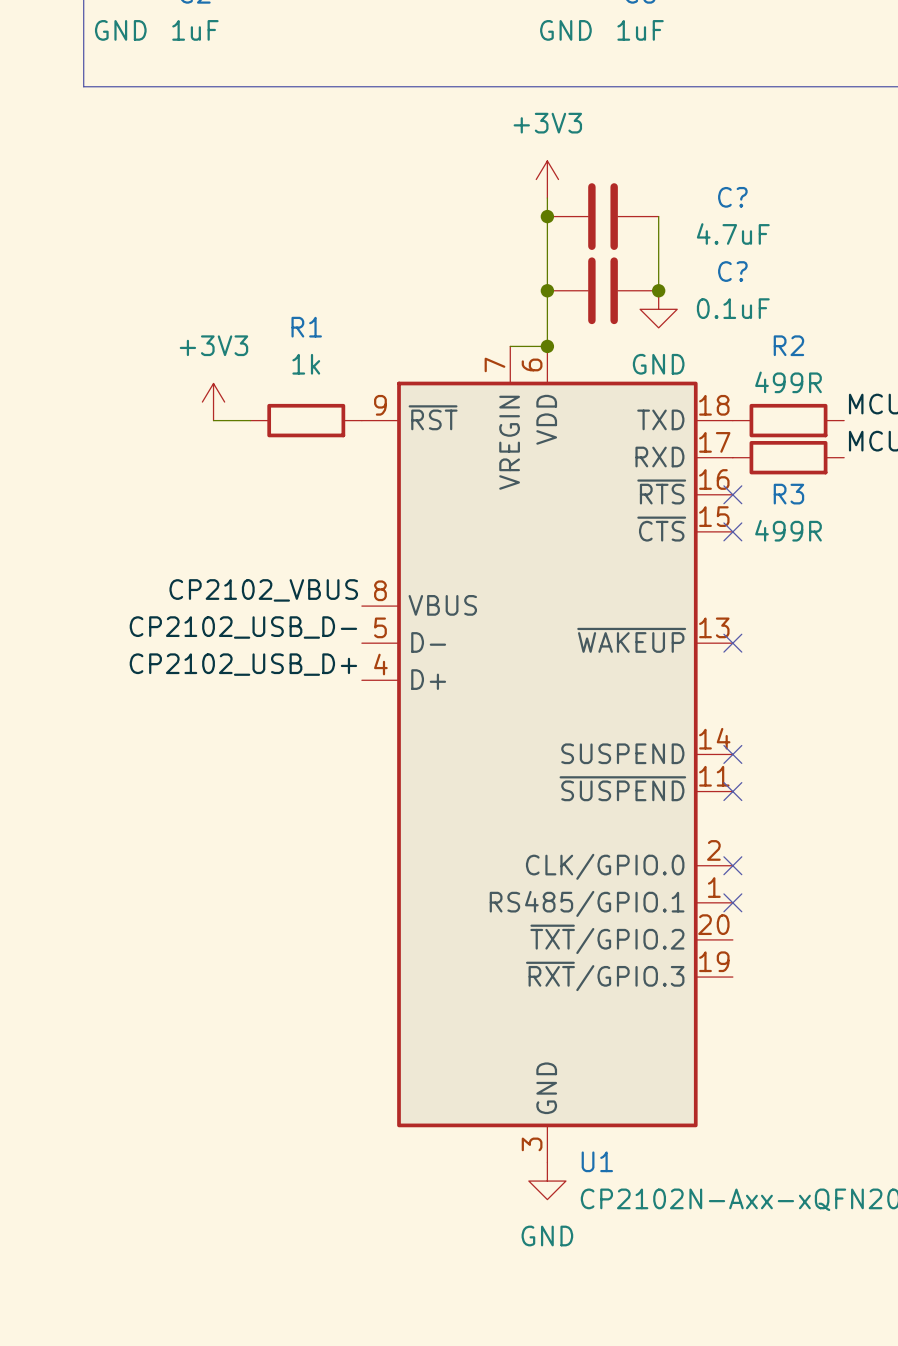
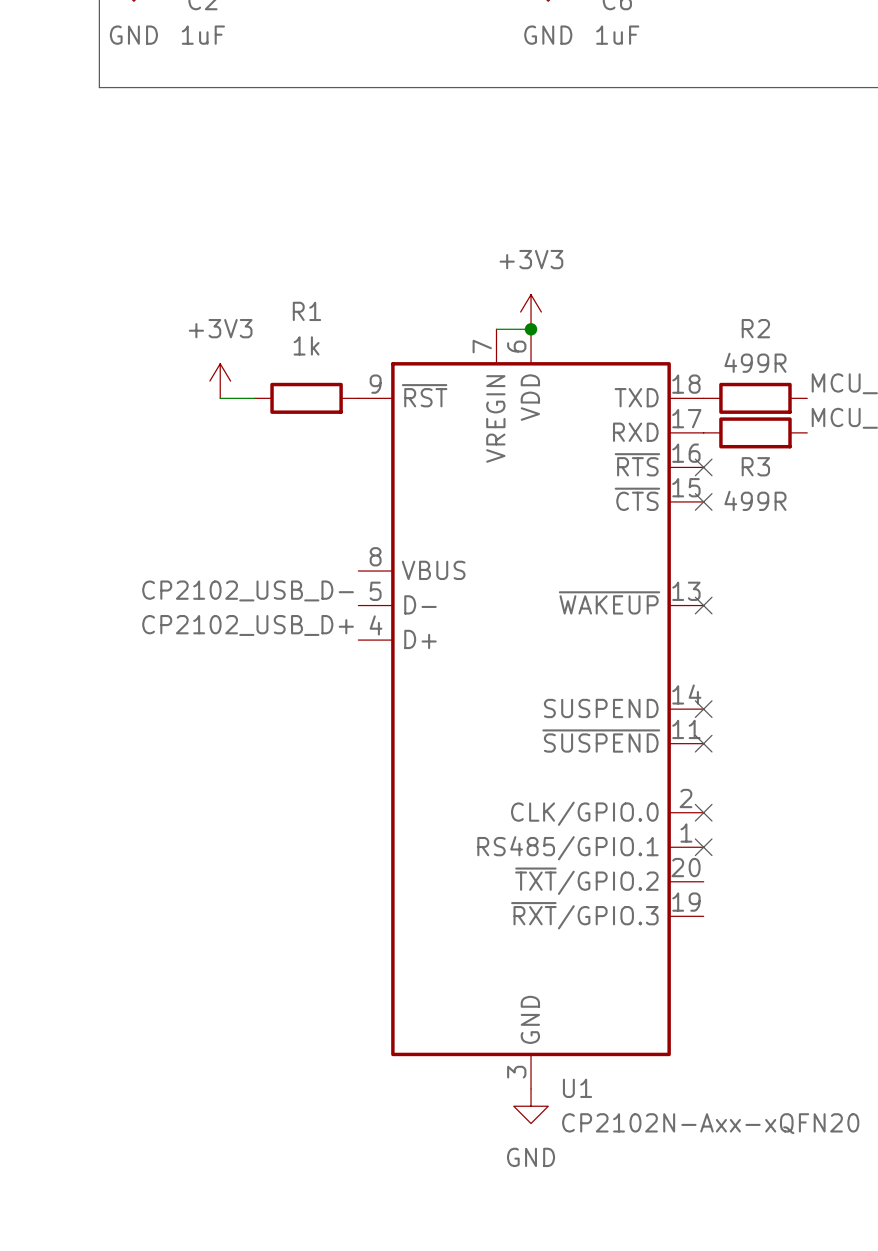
power symbol position: +3V3 (547, 179) -> +3V3 (531, 312)
wire: (547, 198) (547, 346) -> none
junction: (547, 216) -> none
C?: 4.7uF (603, 216) -> none
wire: (658, 216) (658, 290) -> none
junction: (547, 290) -> none
C?: 0.1uF (603, 290) -> none
junction: (658, 290) -> none
power symbol: GND (658, 309) -> none
label: CP2102_VBUS (263, 590) -> none

